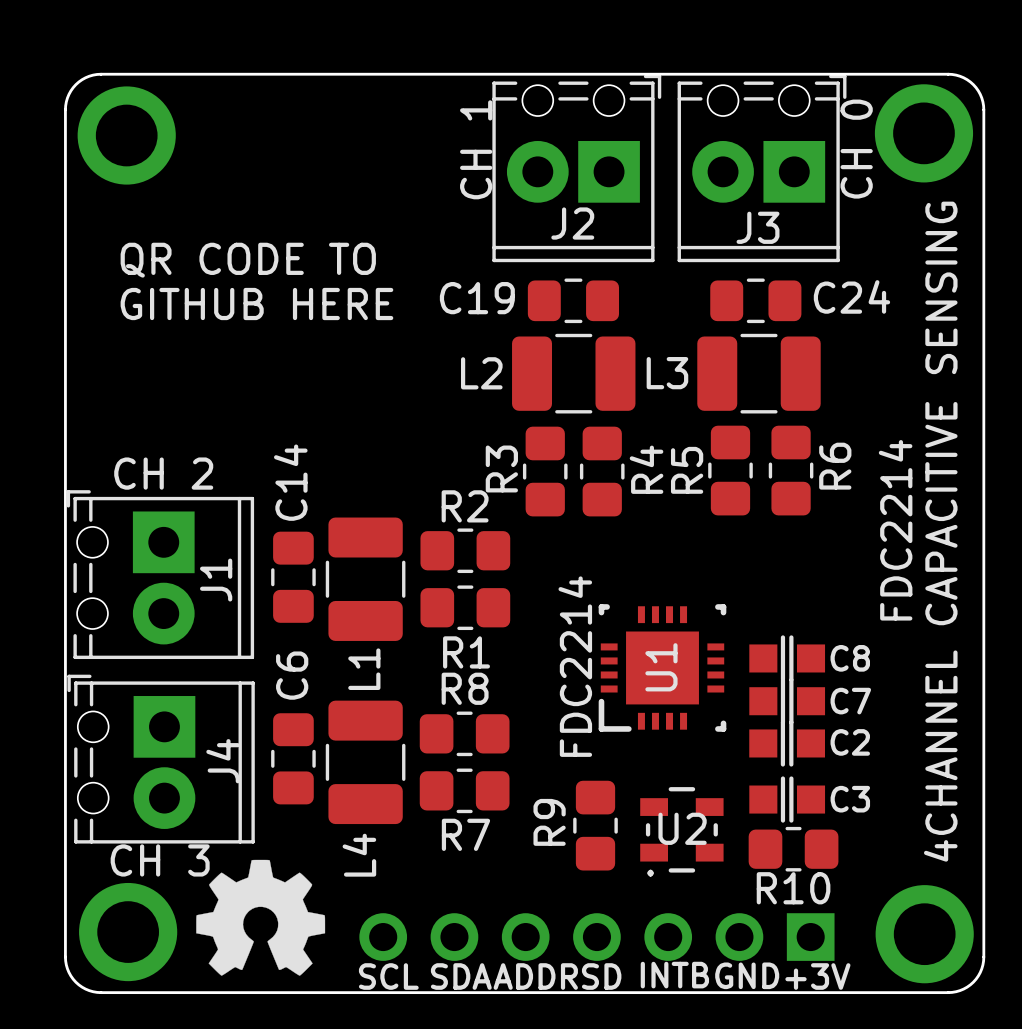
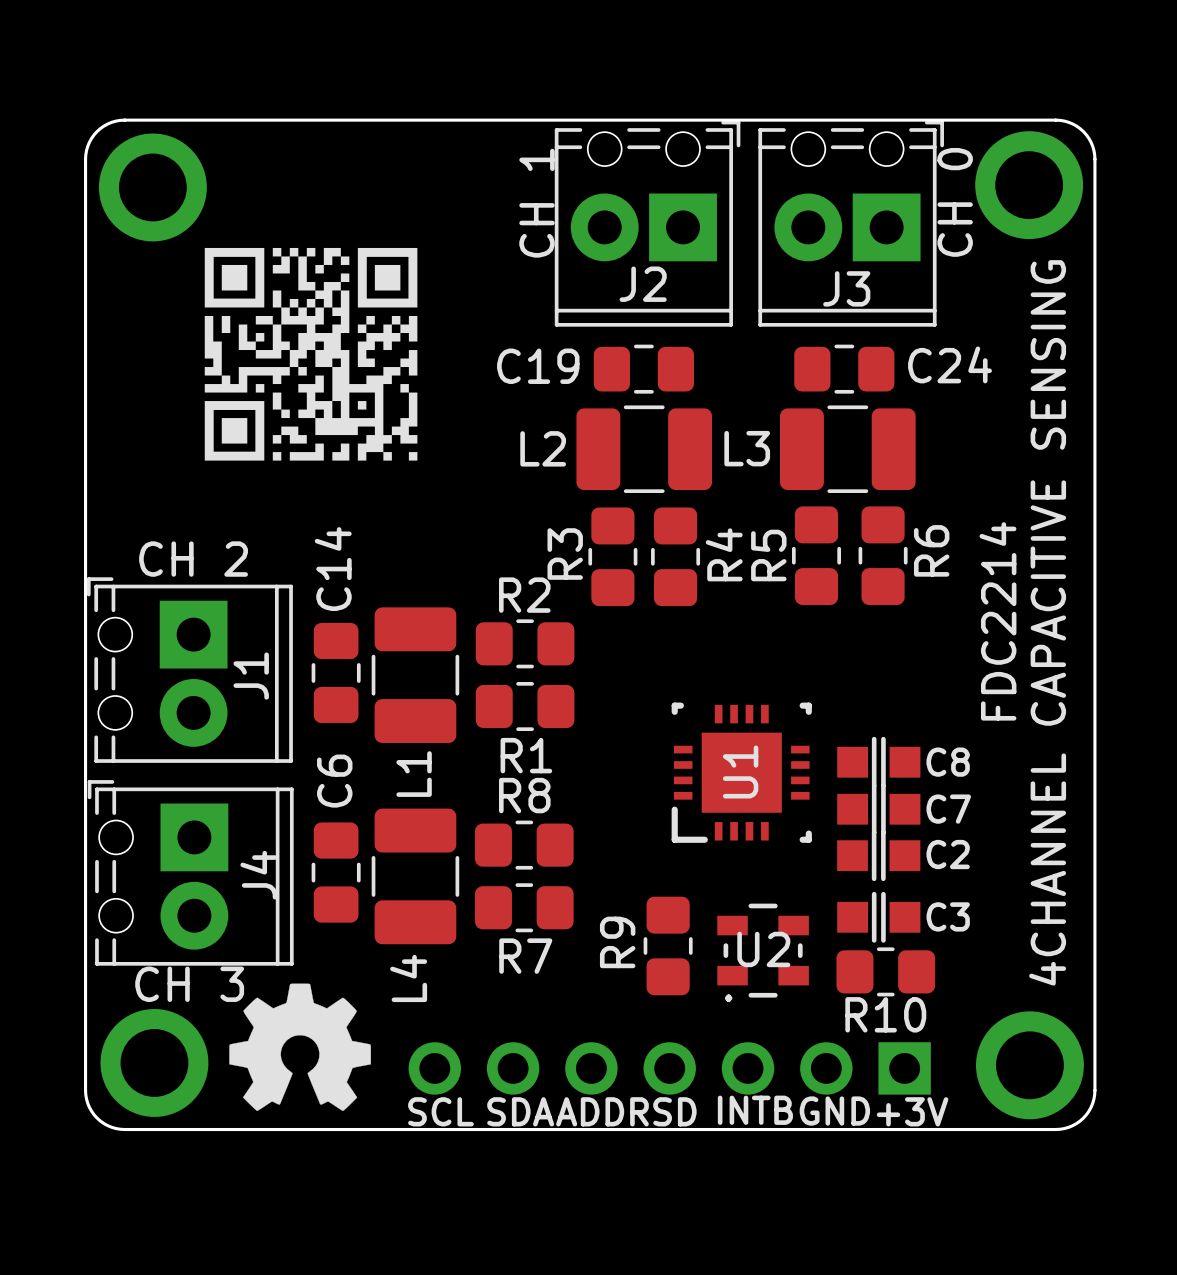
drawing: none -> [204, 247, 418, 461]
text: QR CODE TO (248, 260) -> none
text: GITHUB HERE (256, 304) -> none
U1 text: FDC2214 (575, 666) -> none

